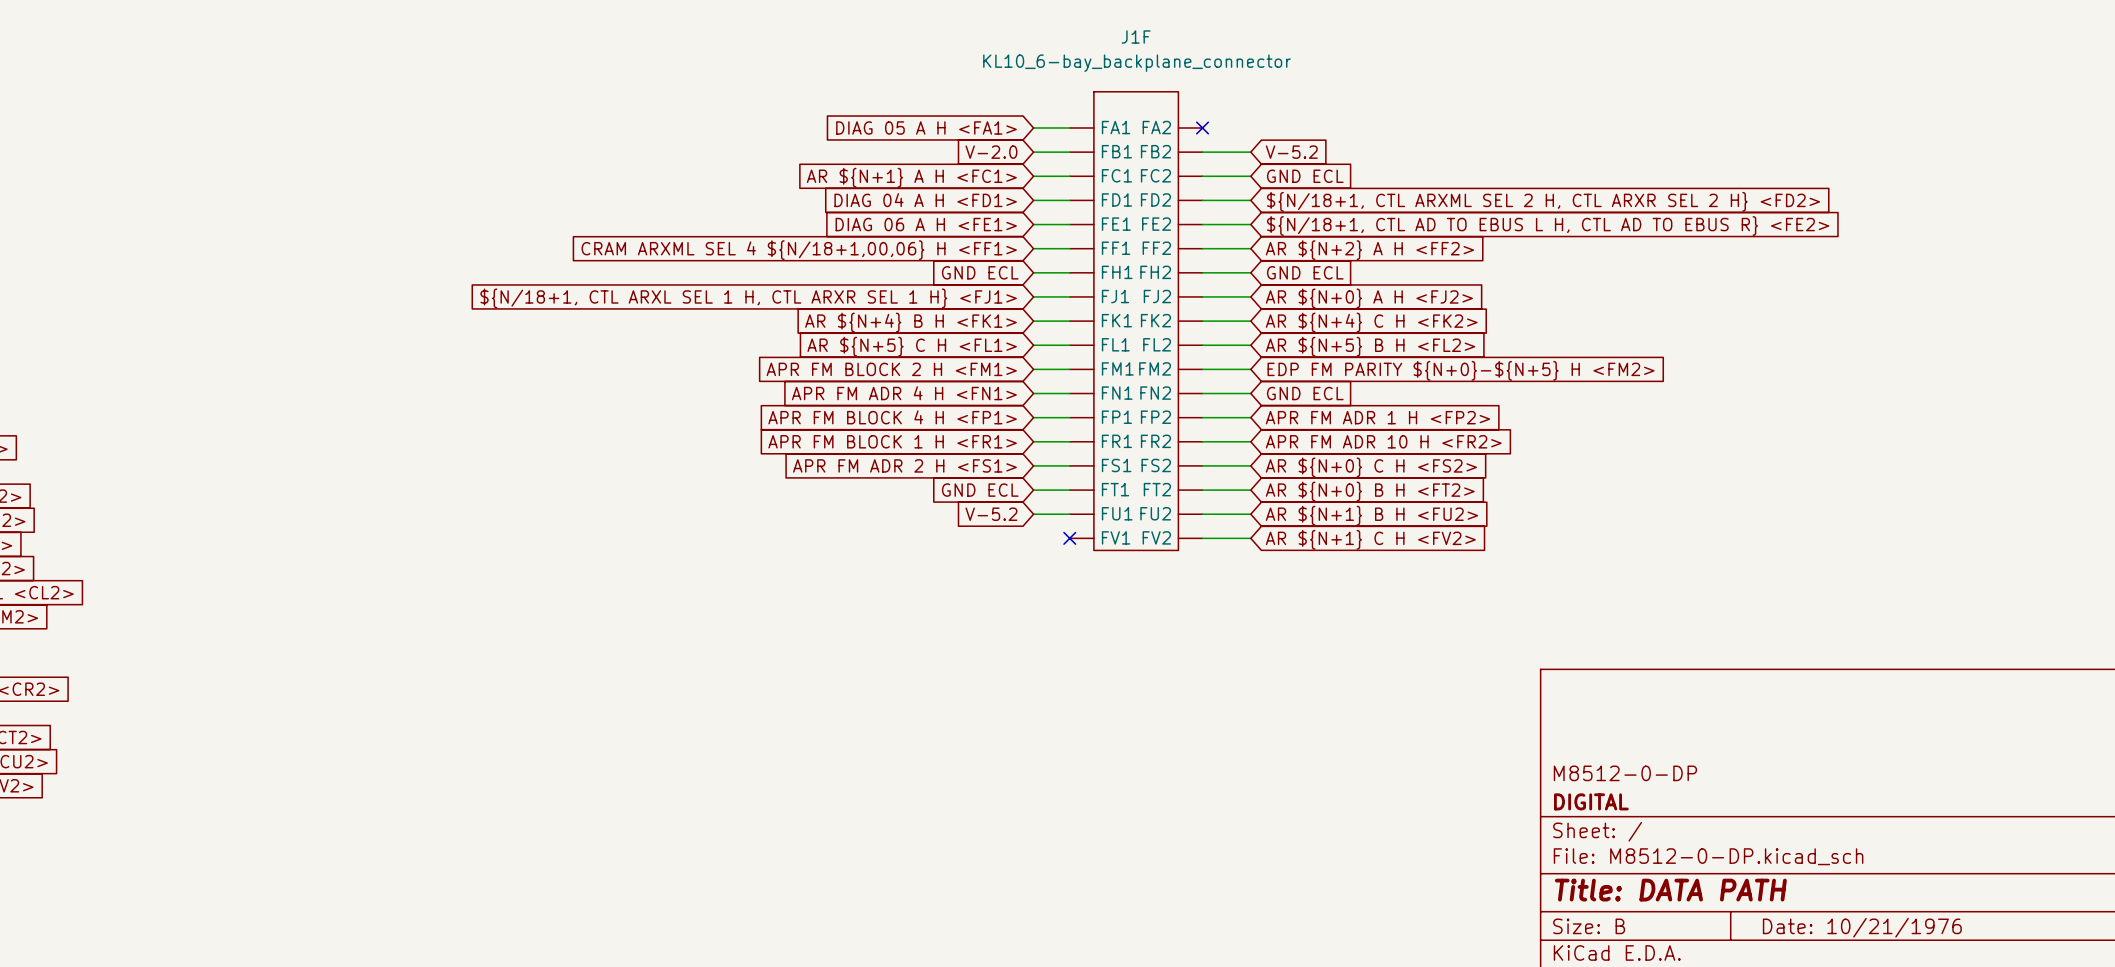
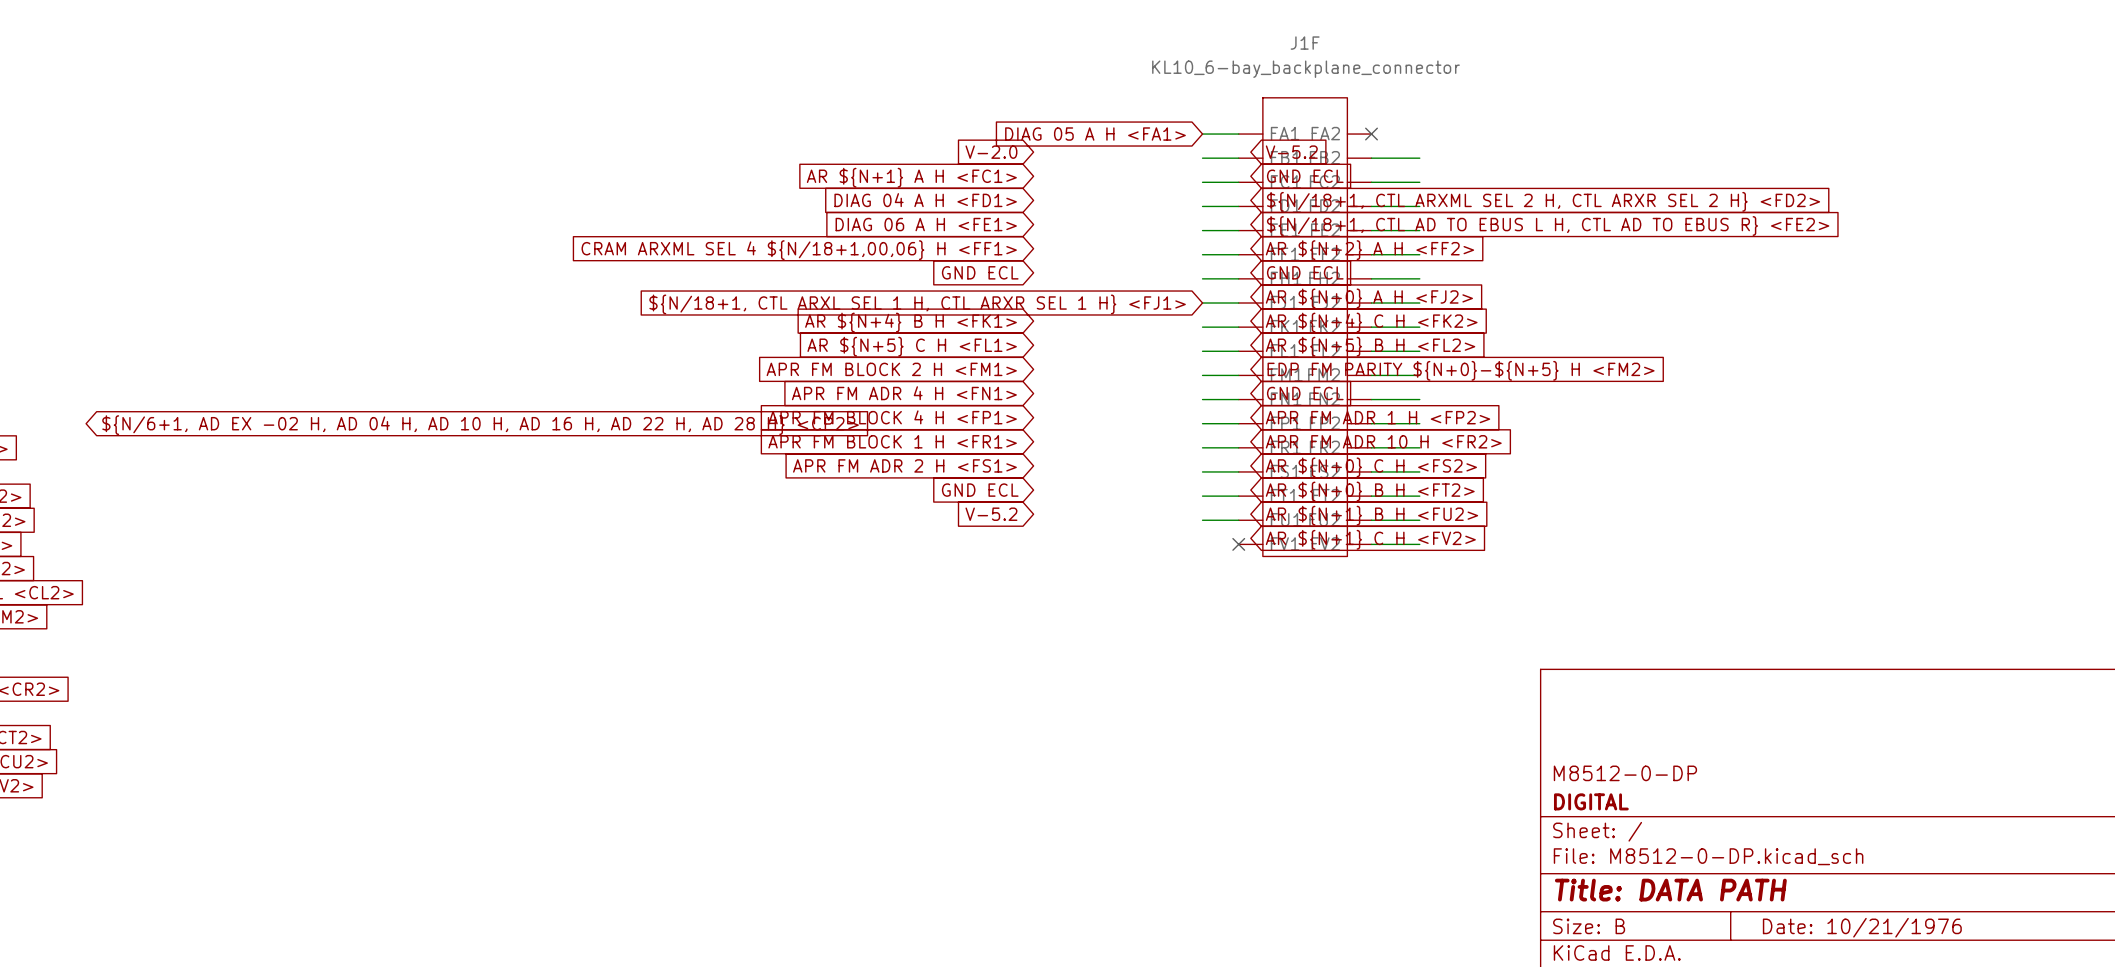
global label position: DIAG 05 A H <FA1> (926, 127) -> DIAG 05 A H <FA1> (1095, 134)
wire: (1033, 127) (1069, 127) -> (1202, 134) (1238, 134)
no-connect mark: (1202, 127) -> none
no-connect mark: none -> (1371, 134)
wire: (1033, 152) (1069, 152) -> (1202, 158) (1238, 158)
wire: (1202, 152) (1250, 152) -> (1371, 158) (1419, 158)
wire: (1033, 176) (1069, 176) -> (1202, 182) (1238, 182)
wire: (1202, 176) (1250, 176) -> (1371, 182) (1419, 182)
wire: (1033, 200) (1069, 200) -> (1202, 206) (1238, 206)
wire: (1202, 200) (1250, 200) -> (1371, 206) (1419, 206)
wire: (1033, 224) (1069, 224) -> (1202, 230) (1238, 230)
wire: (1202, 224) (1250, 224) -> (1371, 230) (1419, 230)
wire: (1033, 248) (1069, 248) -> (1202, 254) (1238, 254)
wire: (1202, 248) (1250, 248) -> (1371, 254) (1419, 254)
wire: (1033, 272) (1069, 272) -> (1202, 278) (1238, 278)
wire: (1202, 272) (1250, 272) -> (1371, 278) (1419, 278)
wire: (1033, 296) (1069, 296) -> (1202, 303) (1238, 303)
wire: (1202, 296) (1250, 296) -> (1371, 303) (1419, 303)
global label position: ${N/18+1, CTL ARXL SEL 1 H, CTL ARXR SEL 1 H} <FJ1> (748, 298) -> ${N/18+1, CTL ARXL SEL 1 H, CTL ARXR SEL 1 H} <FJ1> (917, 304)
wire: (1033, 321) (1069, 321) -> (1202, 327) (1238, 327)
J1F position: (1136, 321) -> (1305, 327)
wire: (1202, 321) (1250, 321) -> (1371, 327) (1419, 327)
wire: (1033, 345) (1069, 345) -> (1202, 351) (1238, 351)
wire: (1202, 345) (1250, 345) -> (1371, 351) (1419, 351)
wire: (1033, 369) (1069, 369) -> (1202, 375) (1238, 375)
wire: (1202, 369) (1250, 369) -> (1371, 375) (1419, 375)
wire: (1033, 393) (1069, 393) -> (1202, 399) (1238, 399)
wire: (1202, 393) (1250, 393) -> (1371, 399) (1419, 399)
wire: (1033, 417) (1069, 417) -> (1202, 423) (1238, 423)
wire: (1202, 417) (1250, 417) -> (1371, 423) (1419, 423)
global label: none -> ${N/6+1, AD EX -02 H, AD 04 H, AD 10 H, AD 16 H, AD 22 H, AD 28 H} <CP2> (480, 425)
wire: (1033, 441) (1069, 441) -> (1202, 447) (1238, 447)
wire: (1202, 441) (1250, 441) -> (1371, 447) (1419, 447)
wire: (1033, 465) (1069, 465) -> (1202, 471) (1238, 471)
wire: (1202, 465) (1250, 465) -> (1371, 471) (1419, 471)
wire: (1033, 490) (1069, 490) -> (1202, 496) (1238, 496)
wire: (1202, 490) (1250, 490) -> (1371, 496) (1419, 496)
wire: (1033, 514) (1069, 514) -> (1202, 520) (1238, 520)
wire: (1202, 514) (1250, 514) -> (1371, 520) (1419, 520)
no-connect mark: (1069, 538) -> none
wire: (1202, 538) (1250, 538) -> (1371, 544) (1419, 544)
no-connect mark: none -> (1238, 544)

